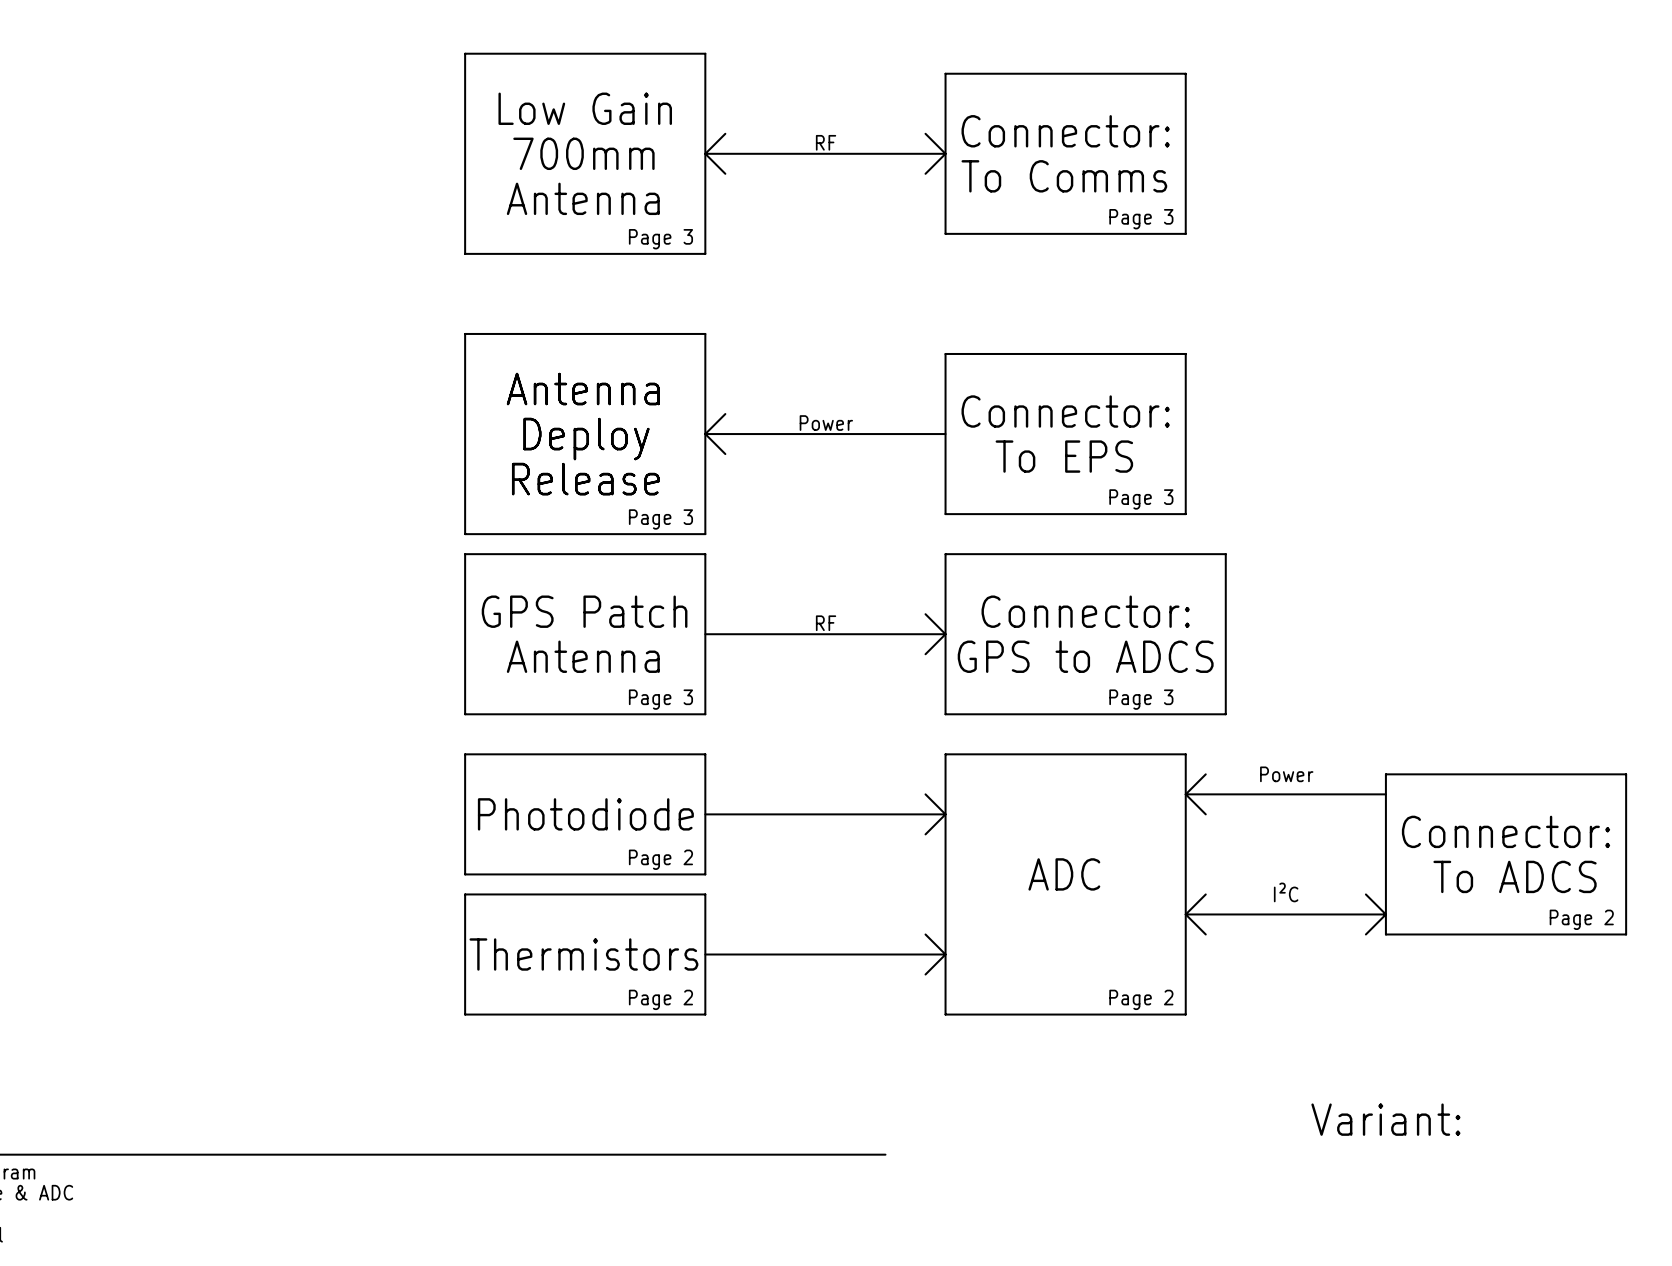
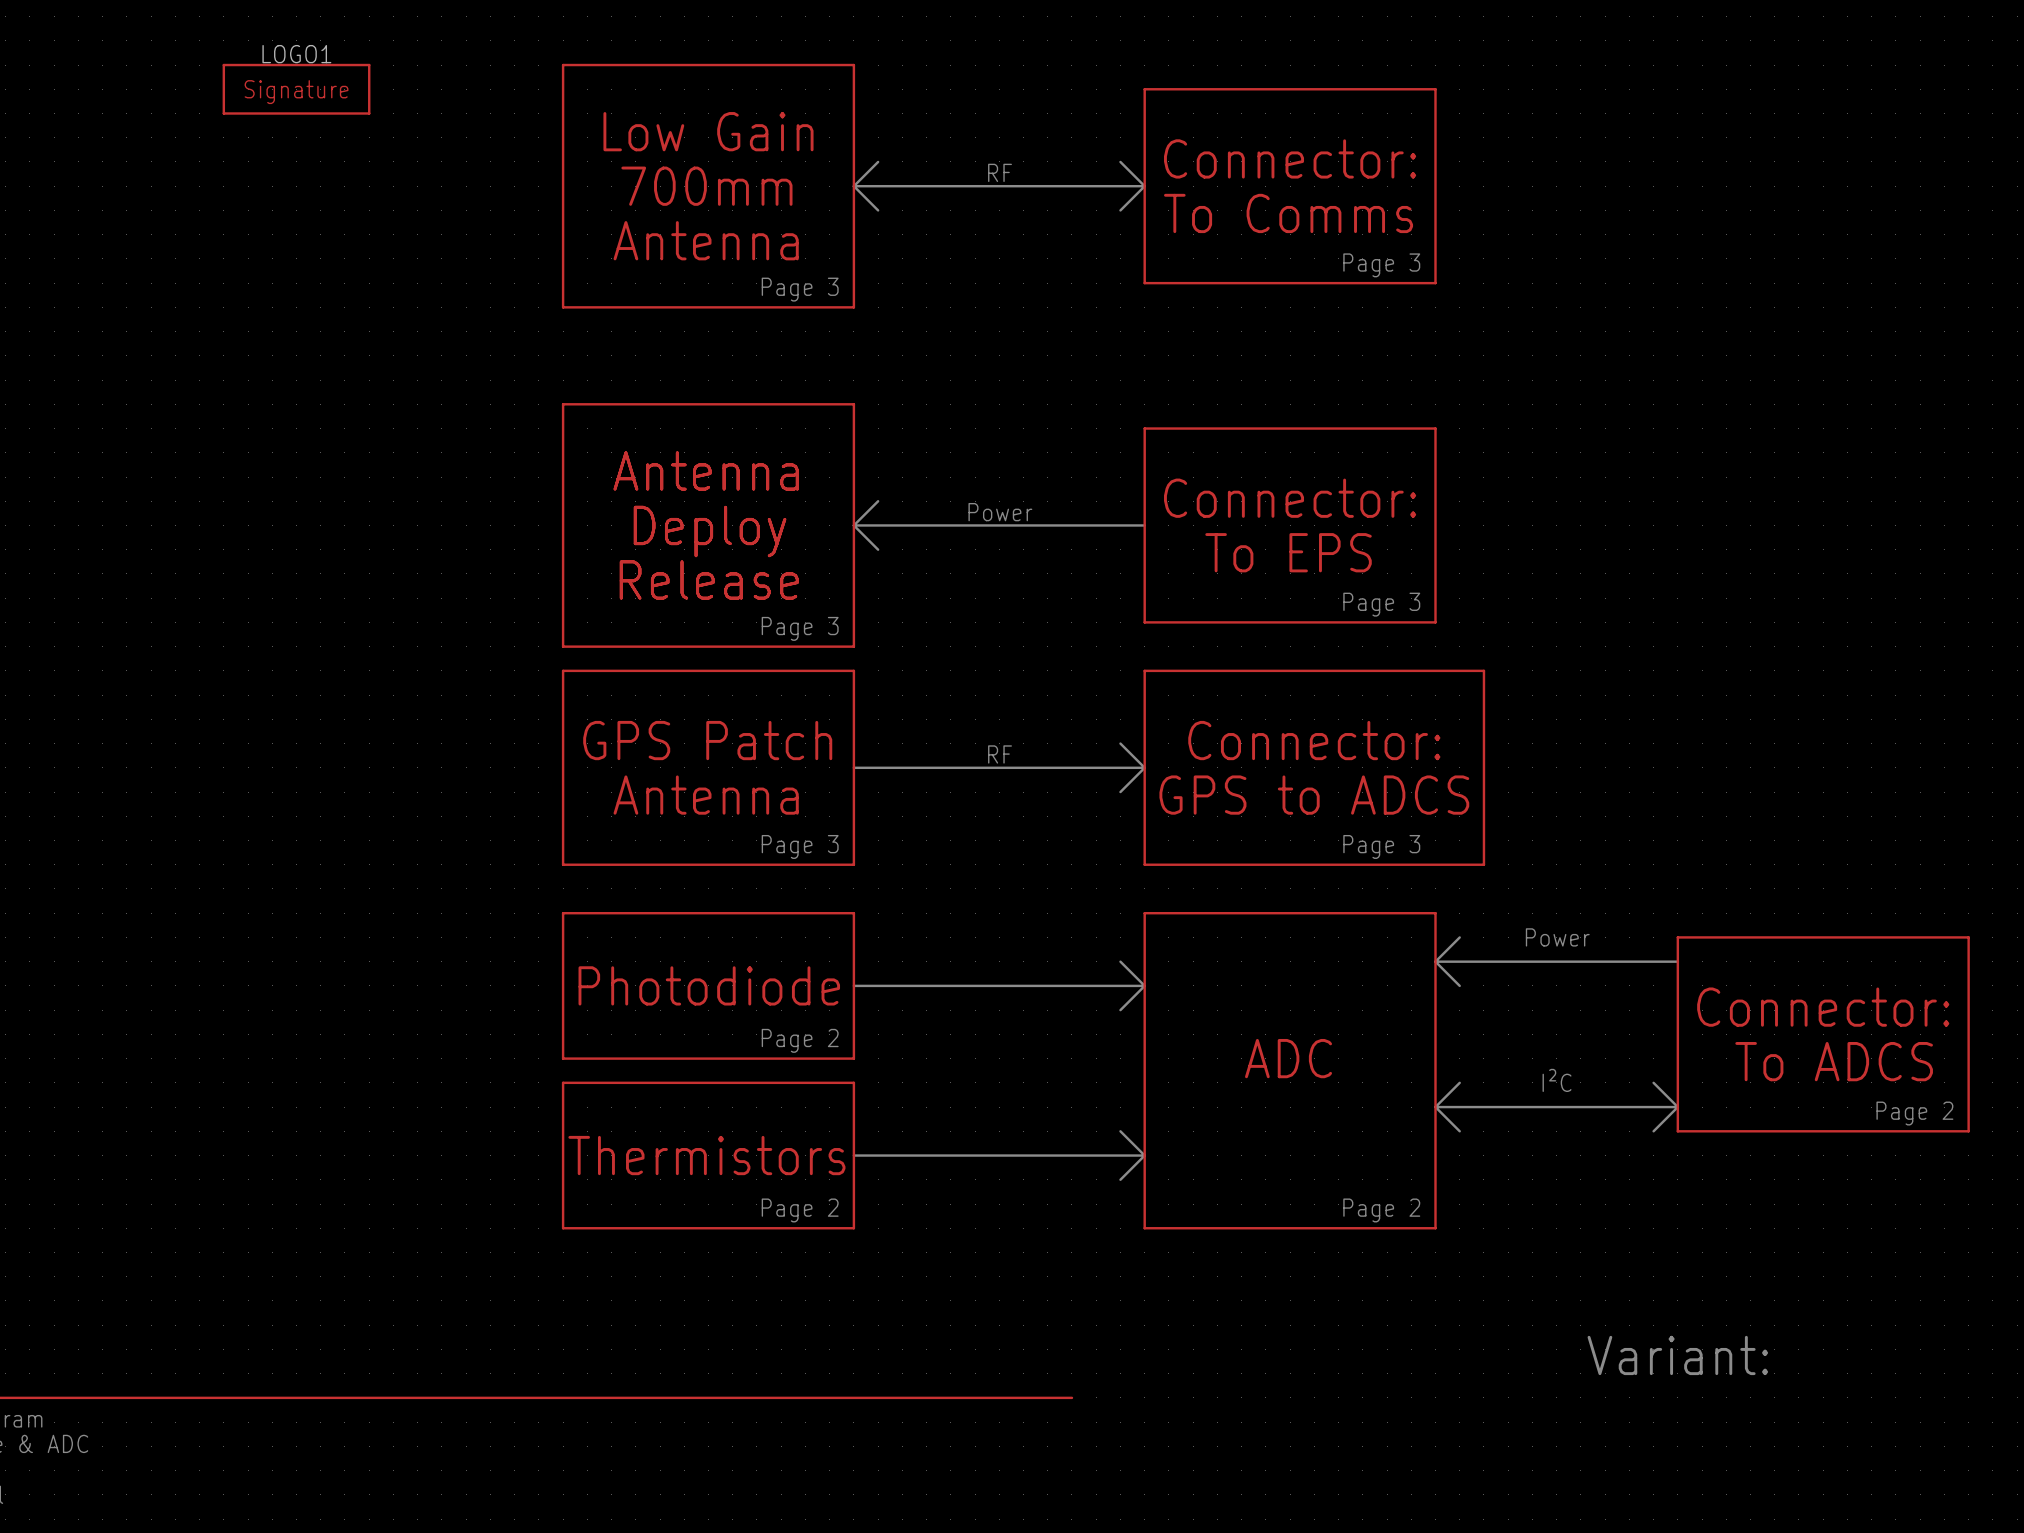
LOGO1: none -> (296, 89)

